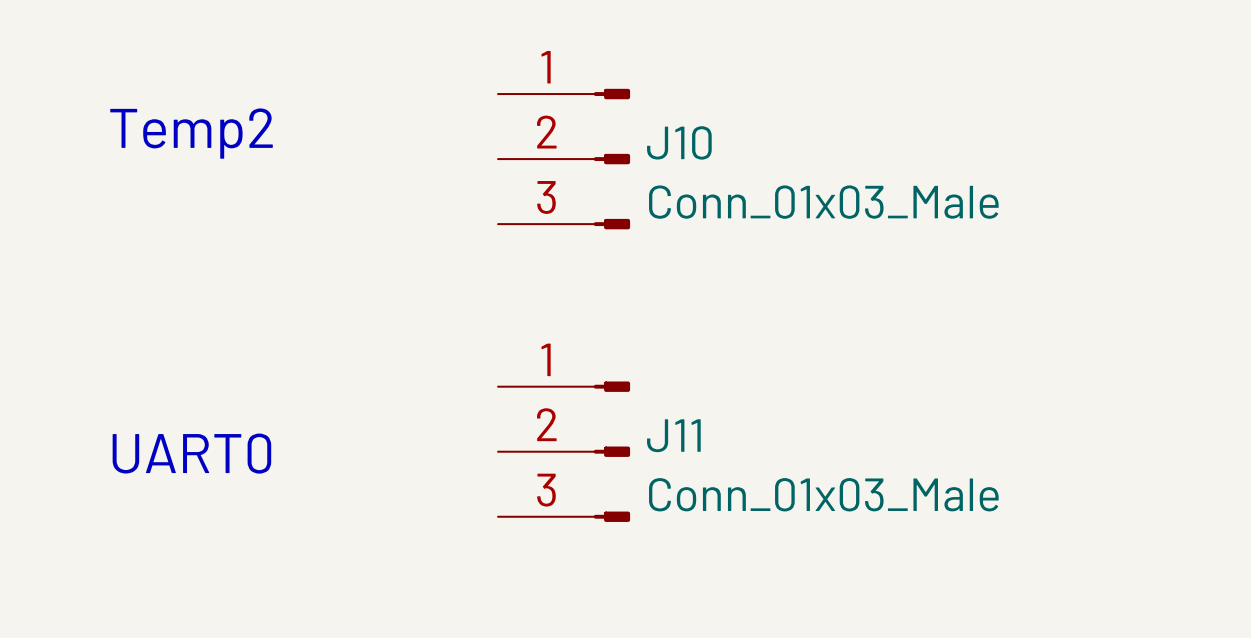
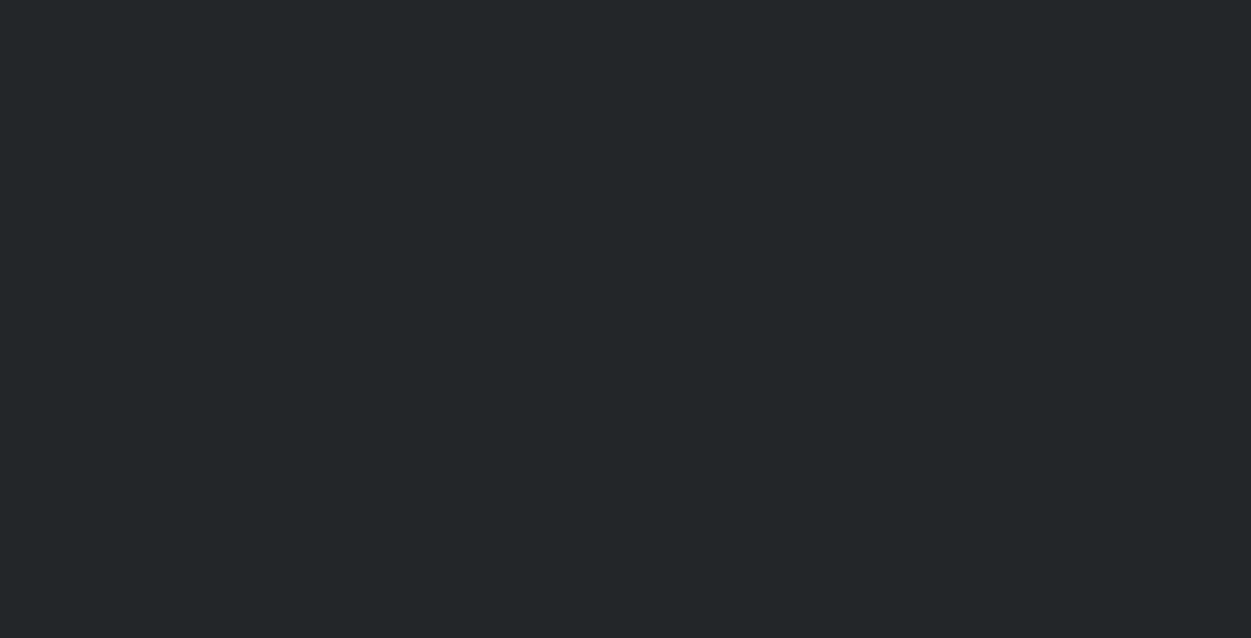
text: Temp2 (191, 133) -> none
J10: Conn_01x03_Male (564, 159) -> none
J11: Conn_01x03_Male (564, 451) -> none
text: UART0 (191, 453) -> none

